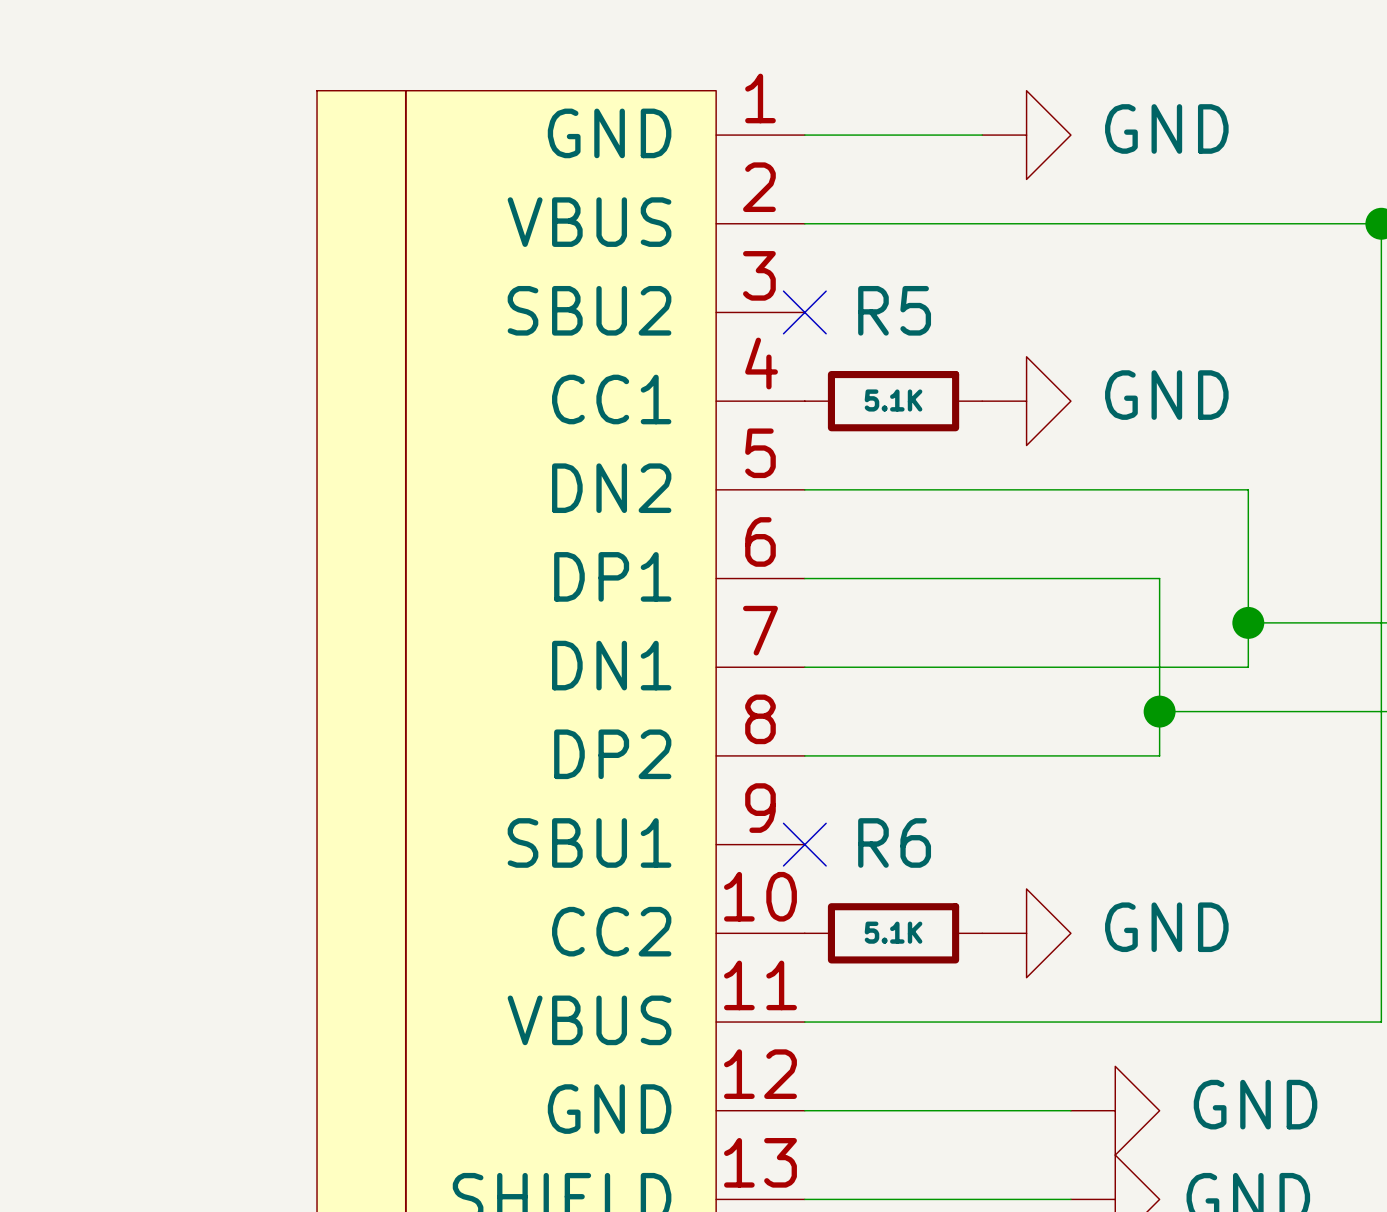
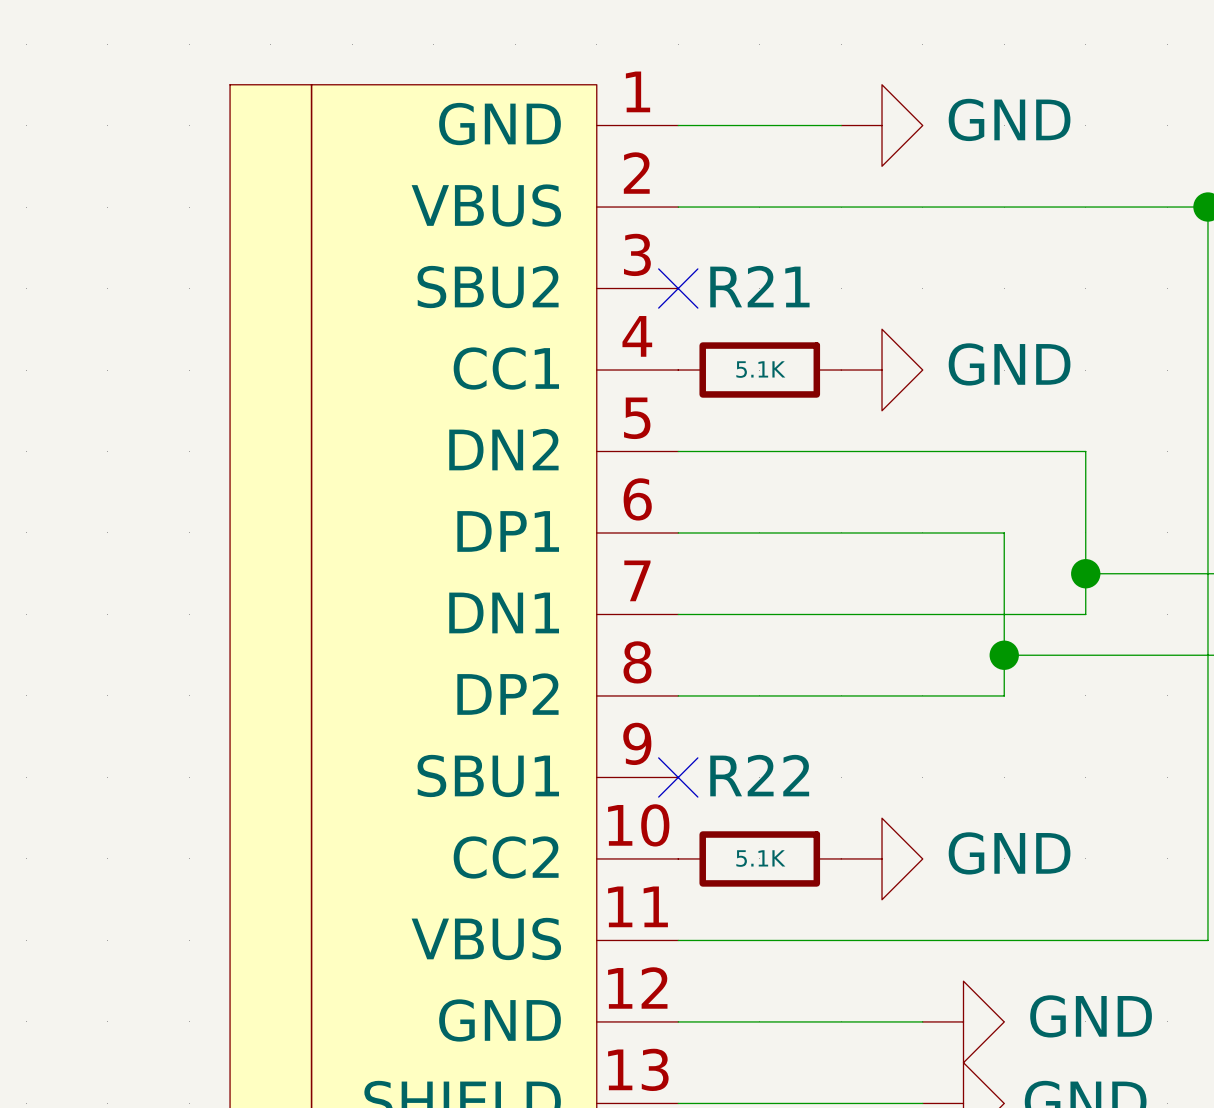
R5 name: R5 (894, 310) -> R21 (759, 286)
R6 name: R6 (894, 842) -> R22 (759, 775)

